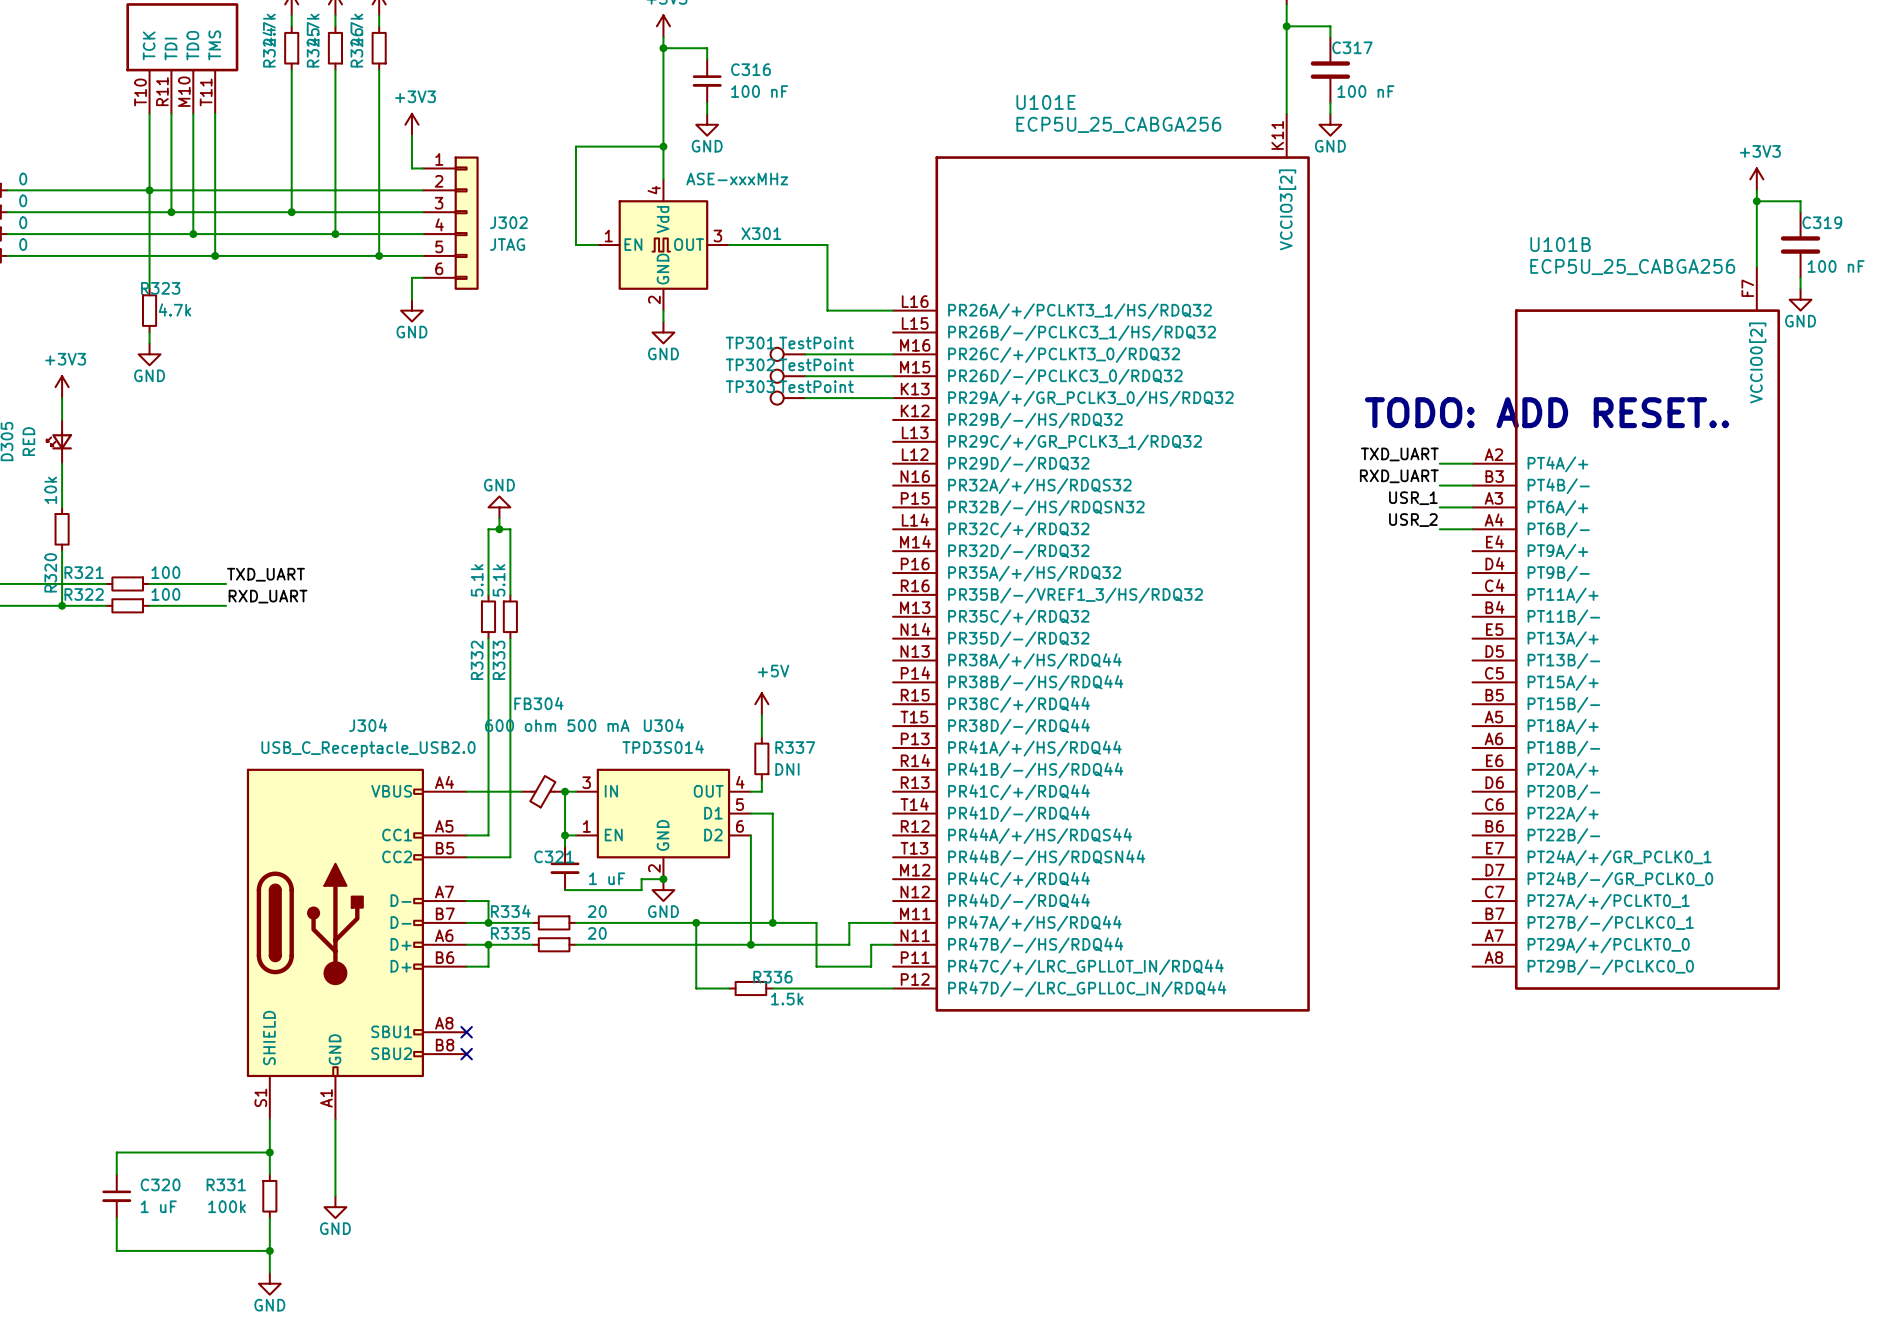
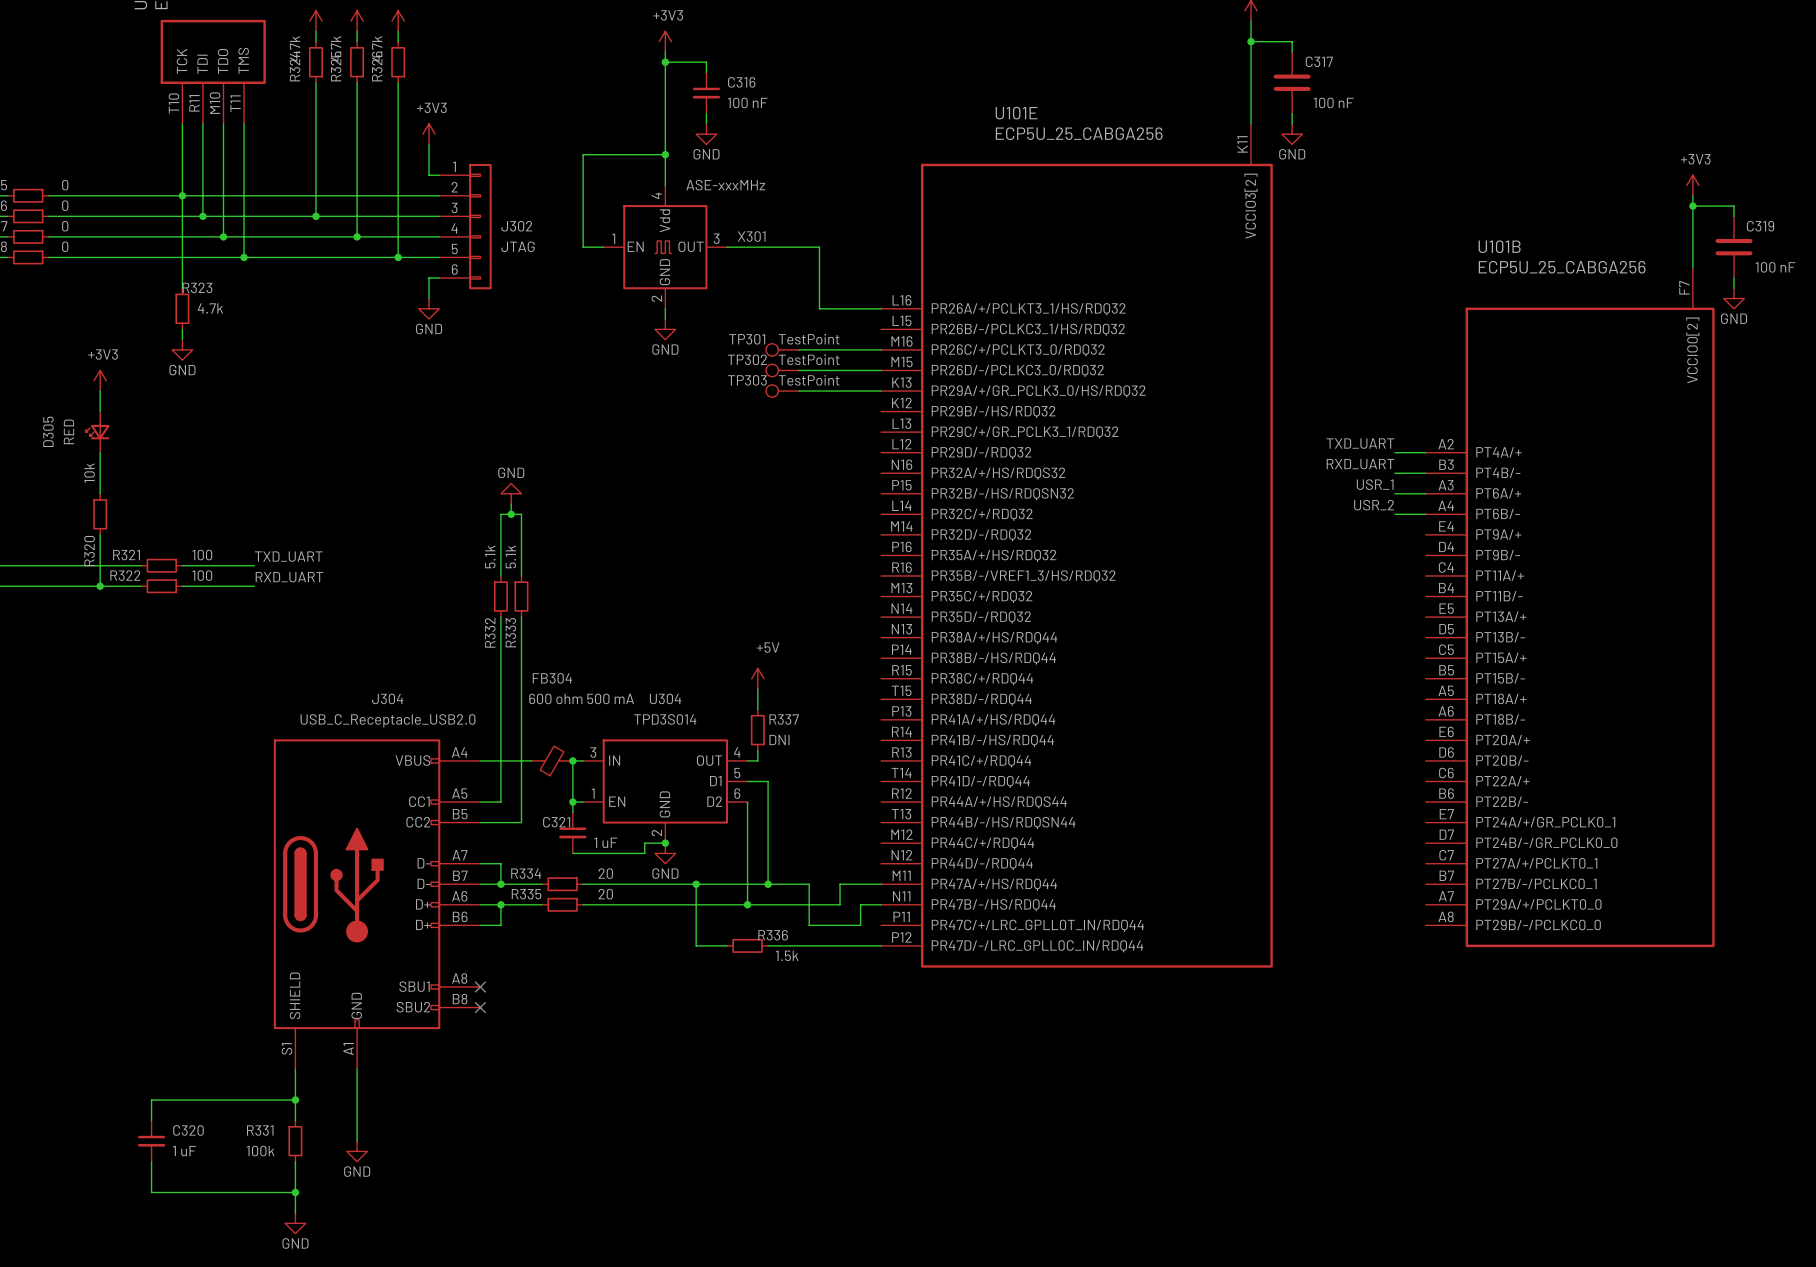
text: TODO: ADD RESET.. (1547, 412) -> none

